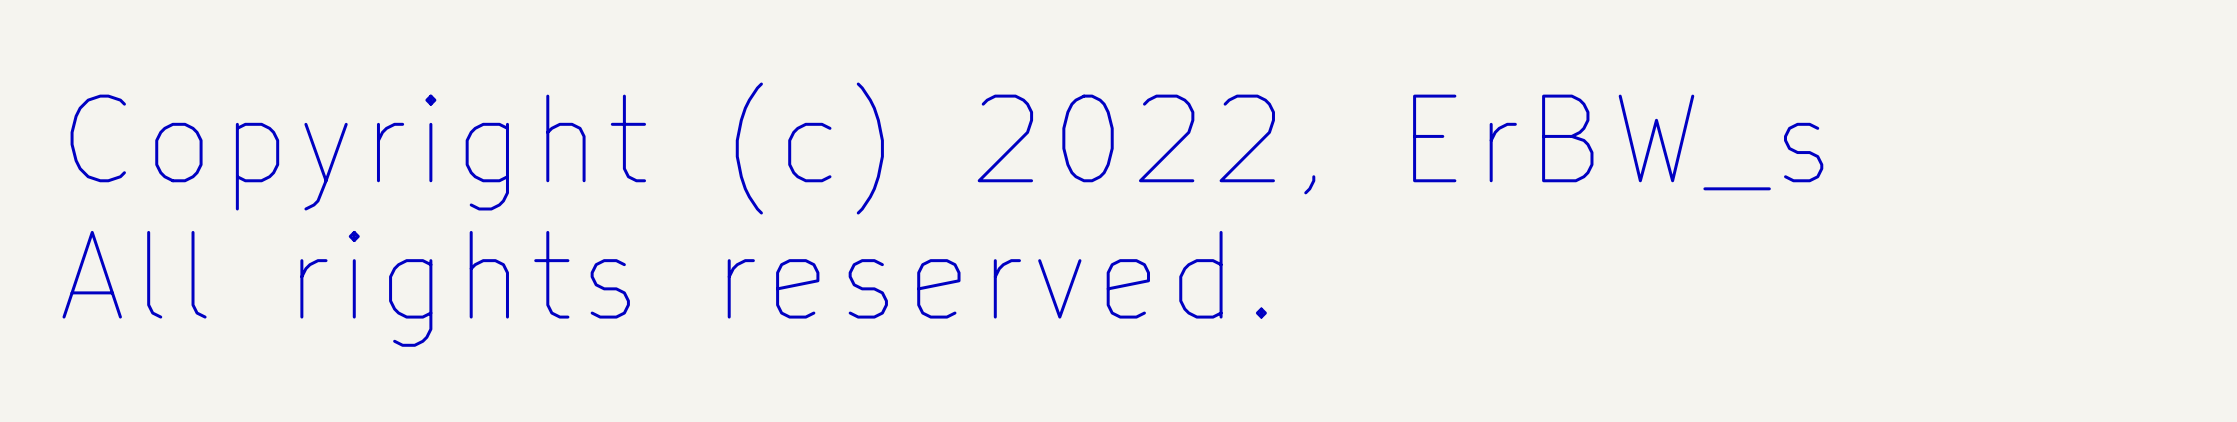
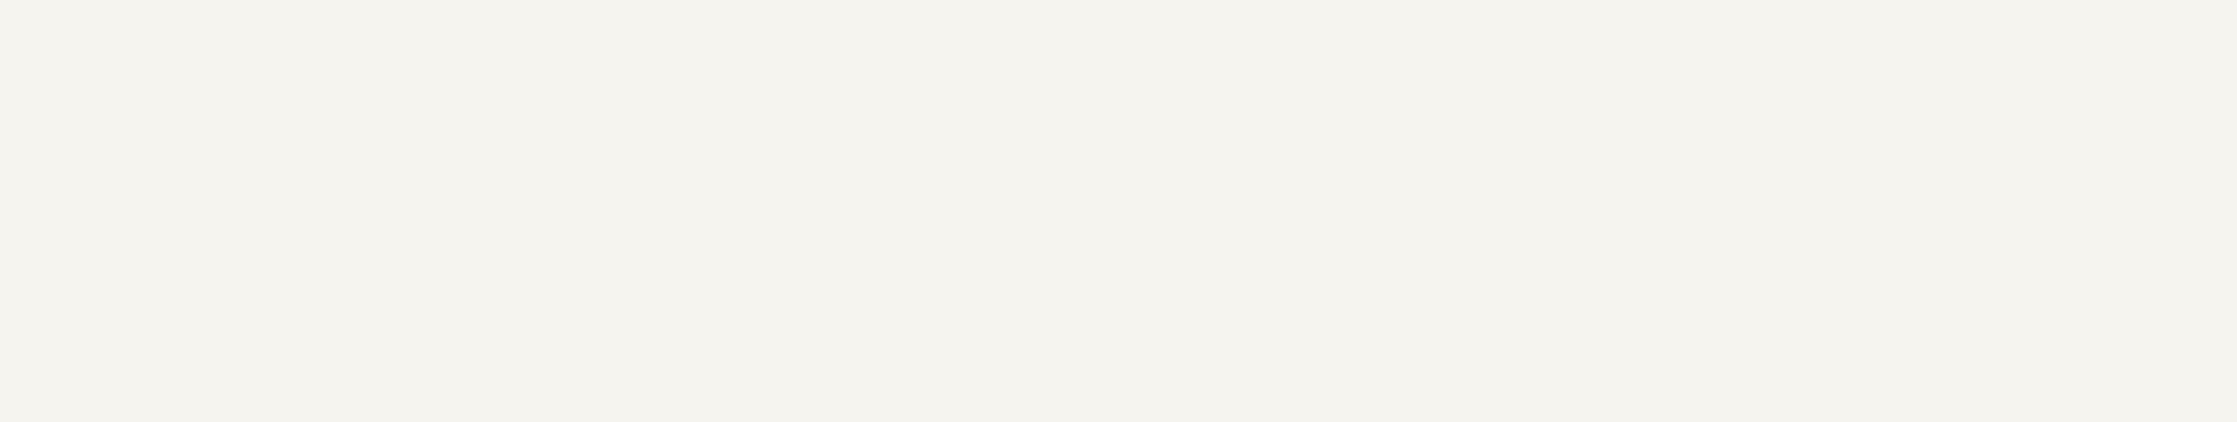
text: Copyright (c) 2022, ErBW_s (946, 148) -> none
text: All rights reserved. (664, 288) -> none

